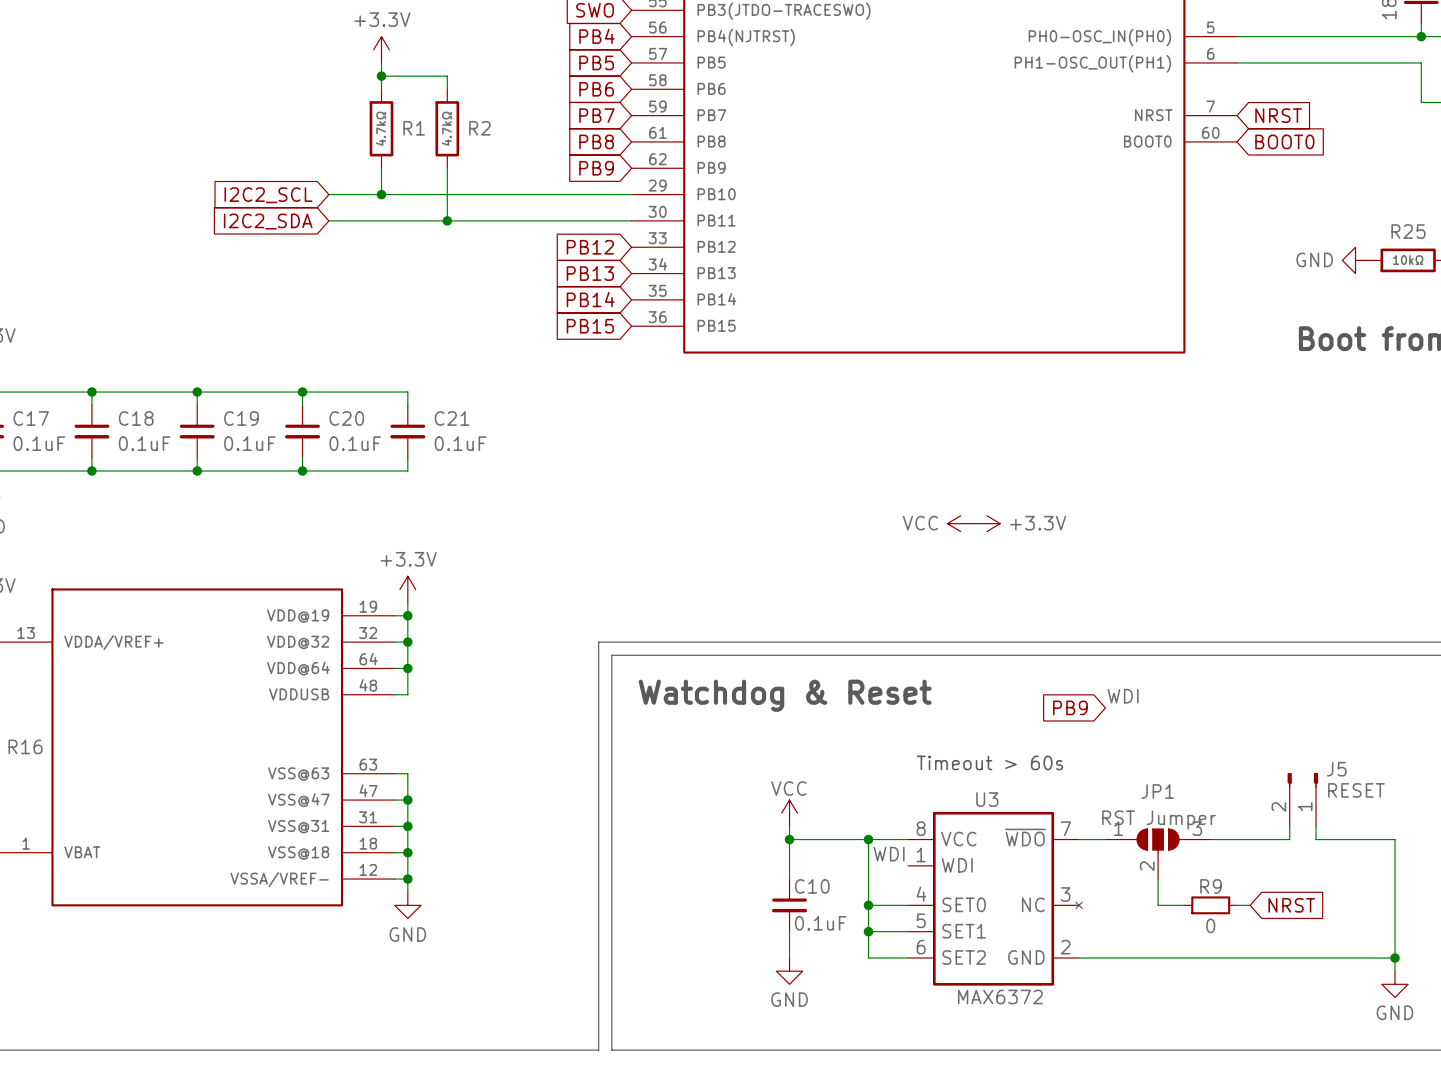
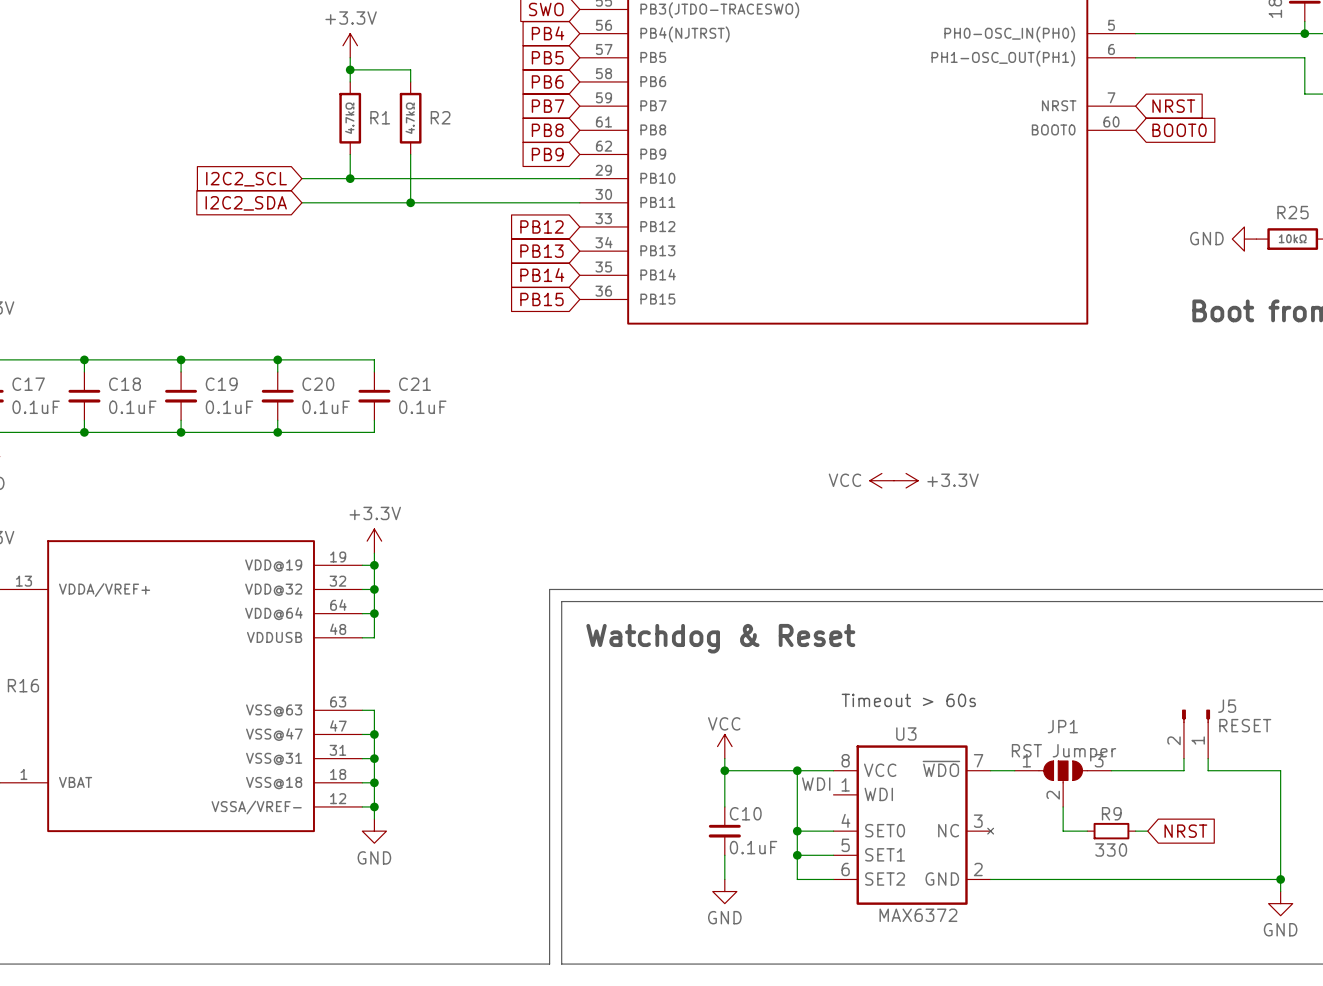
label: WDI (1123, 696) -> none
global label: PB9 (1070, 707) -> none
R9 value: 0 (1210, 925) -> 330 (1111, 850)

